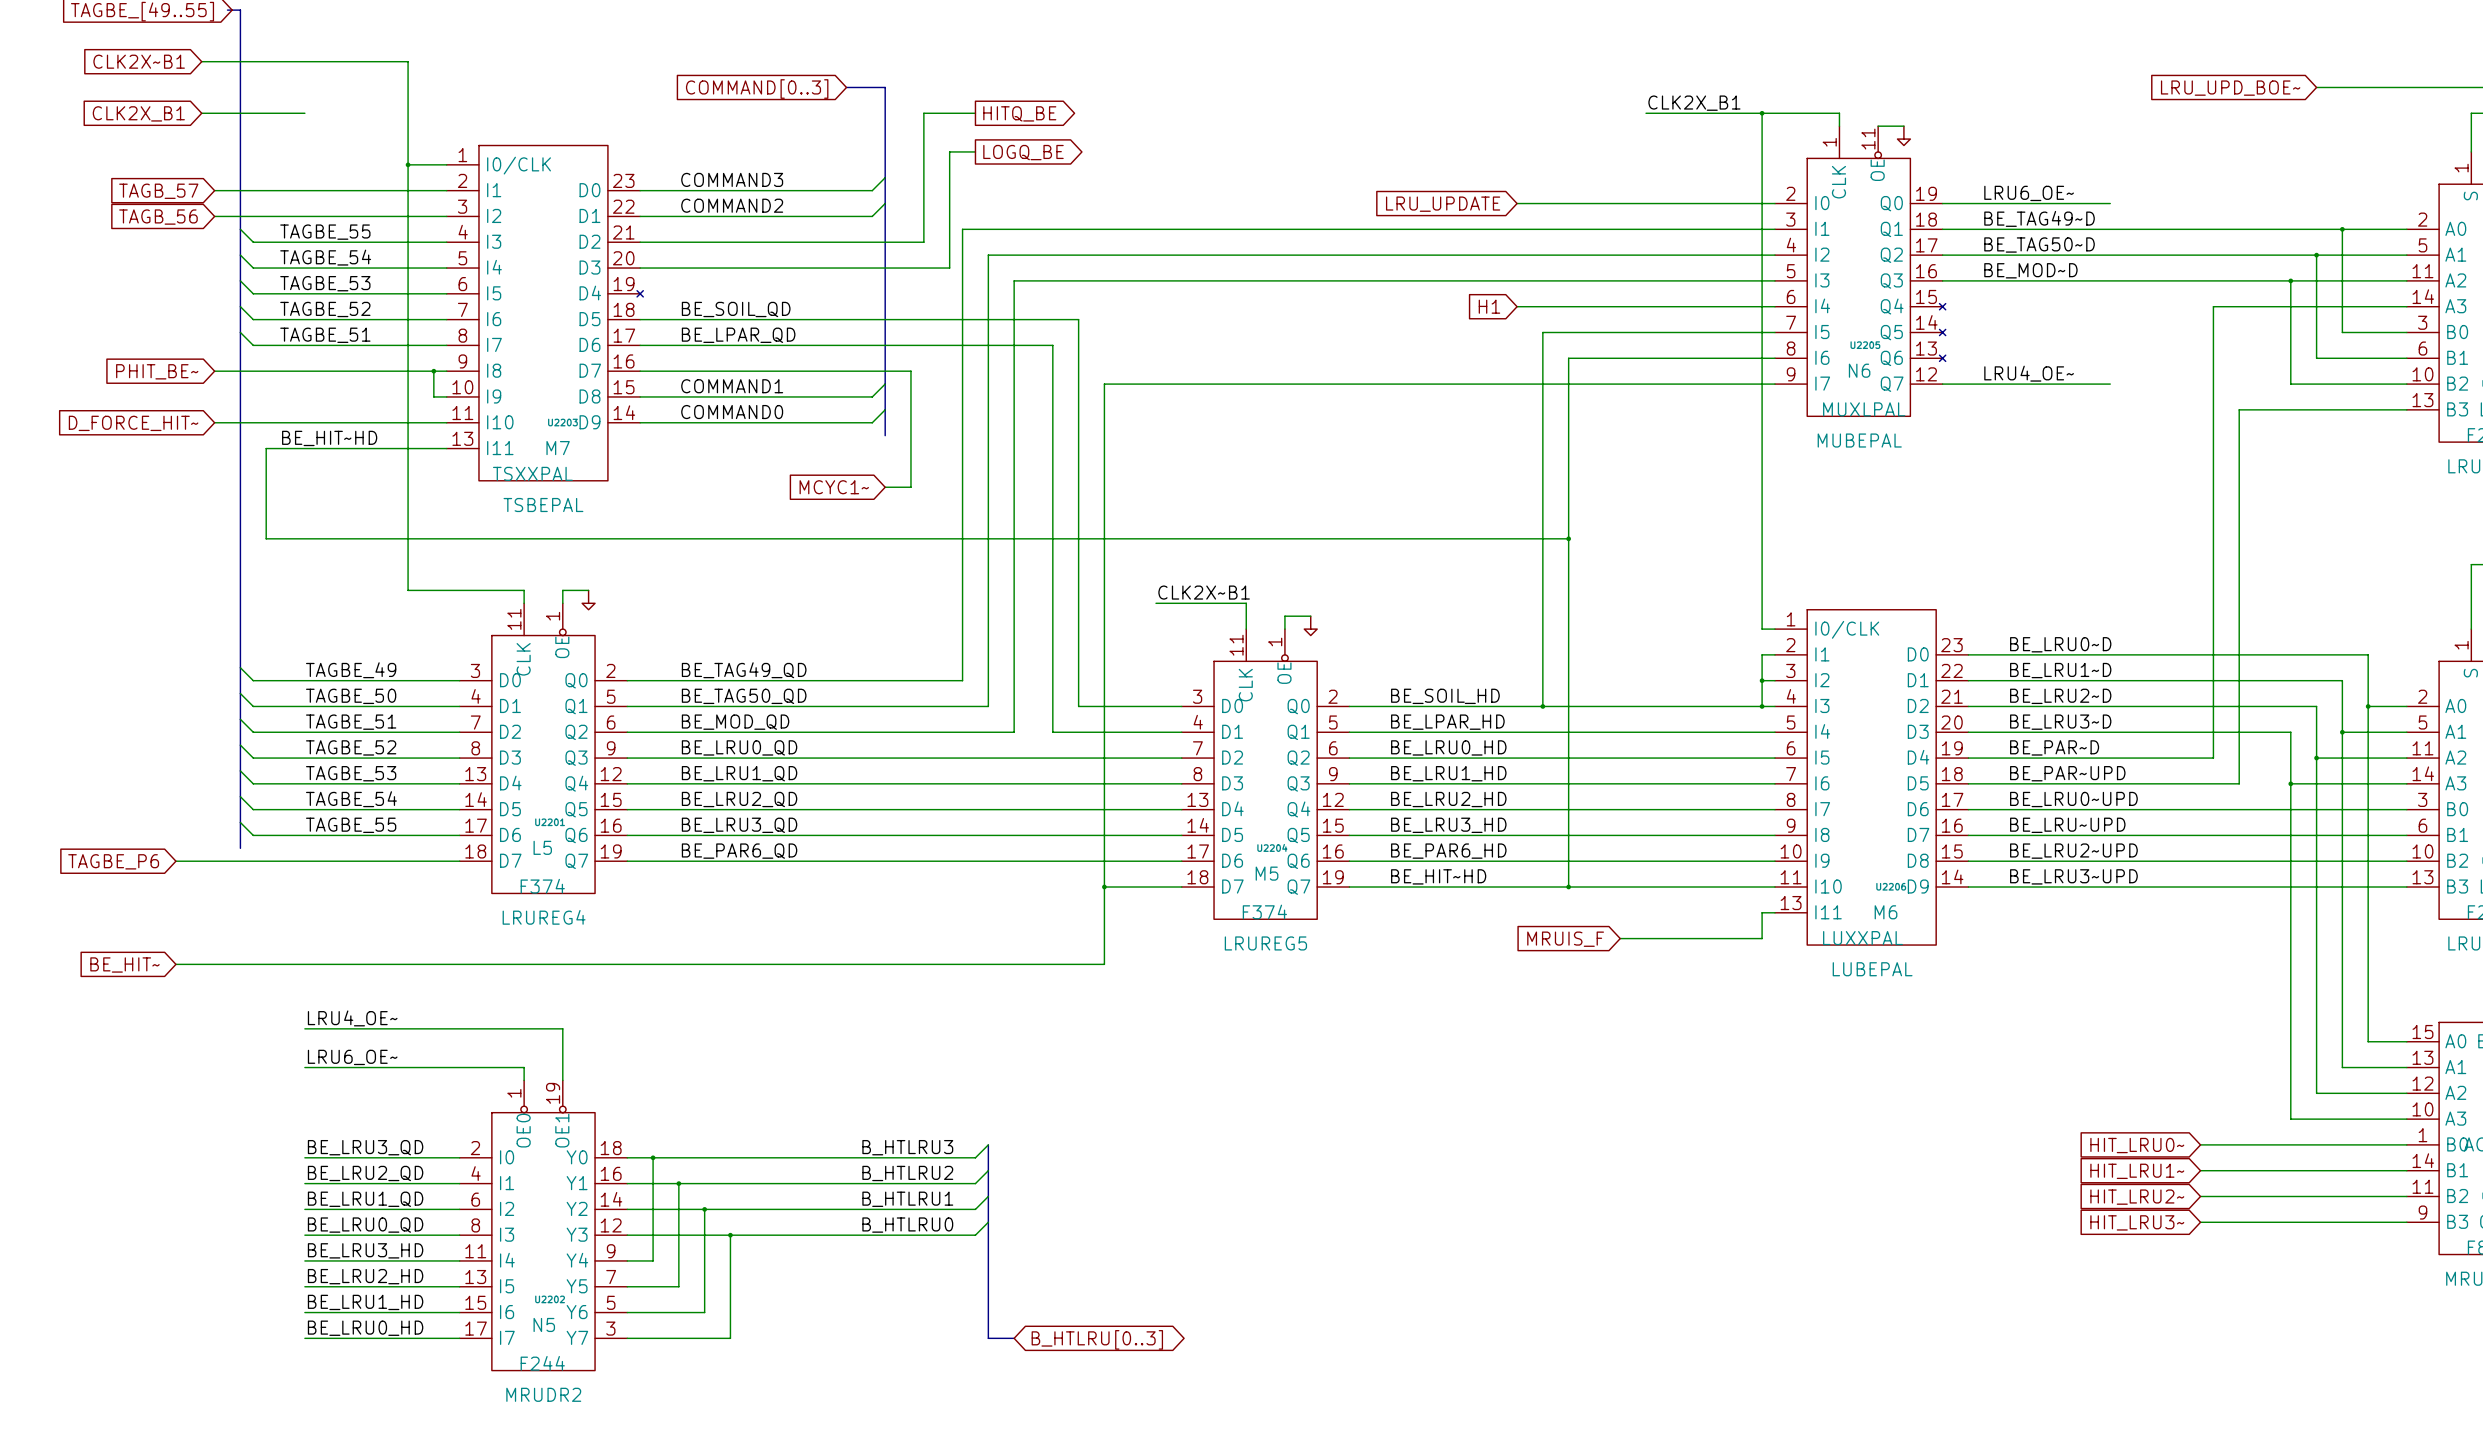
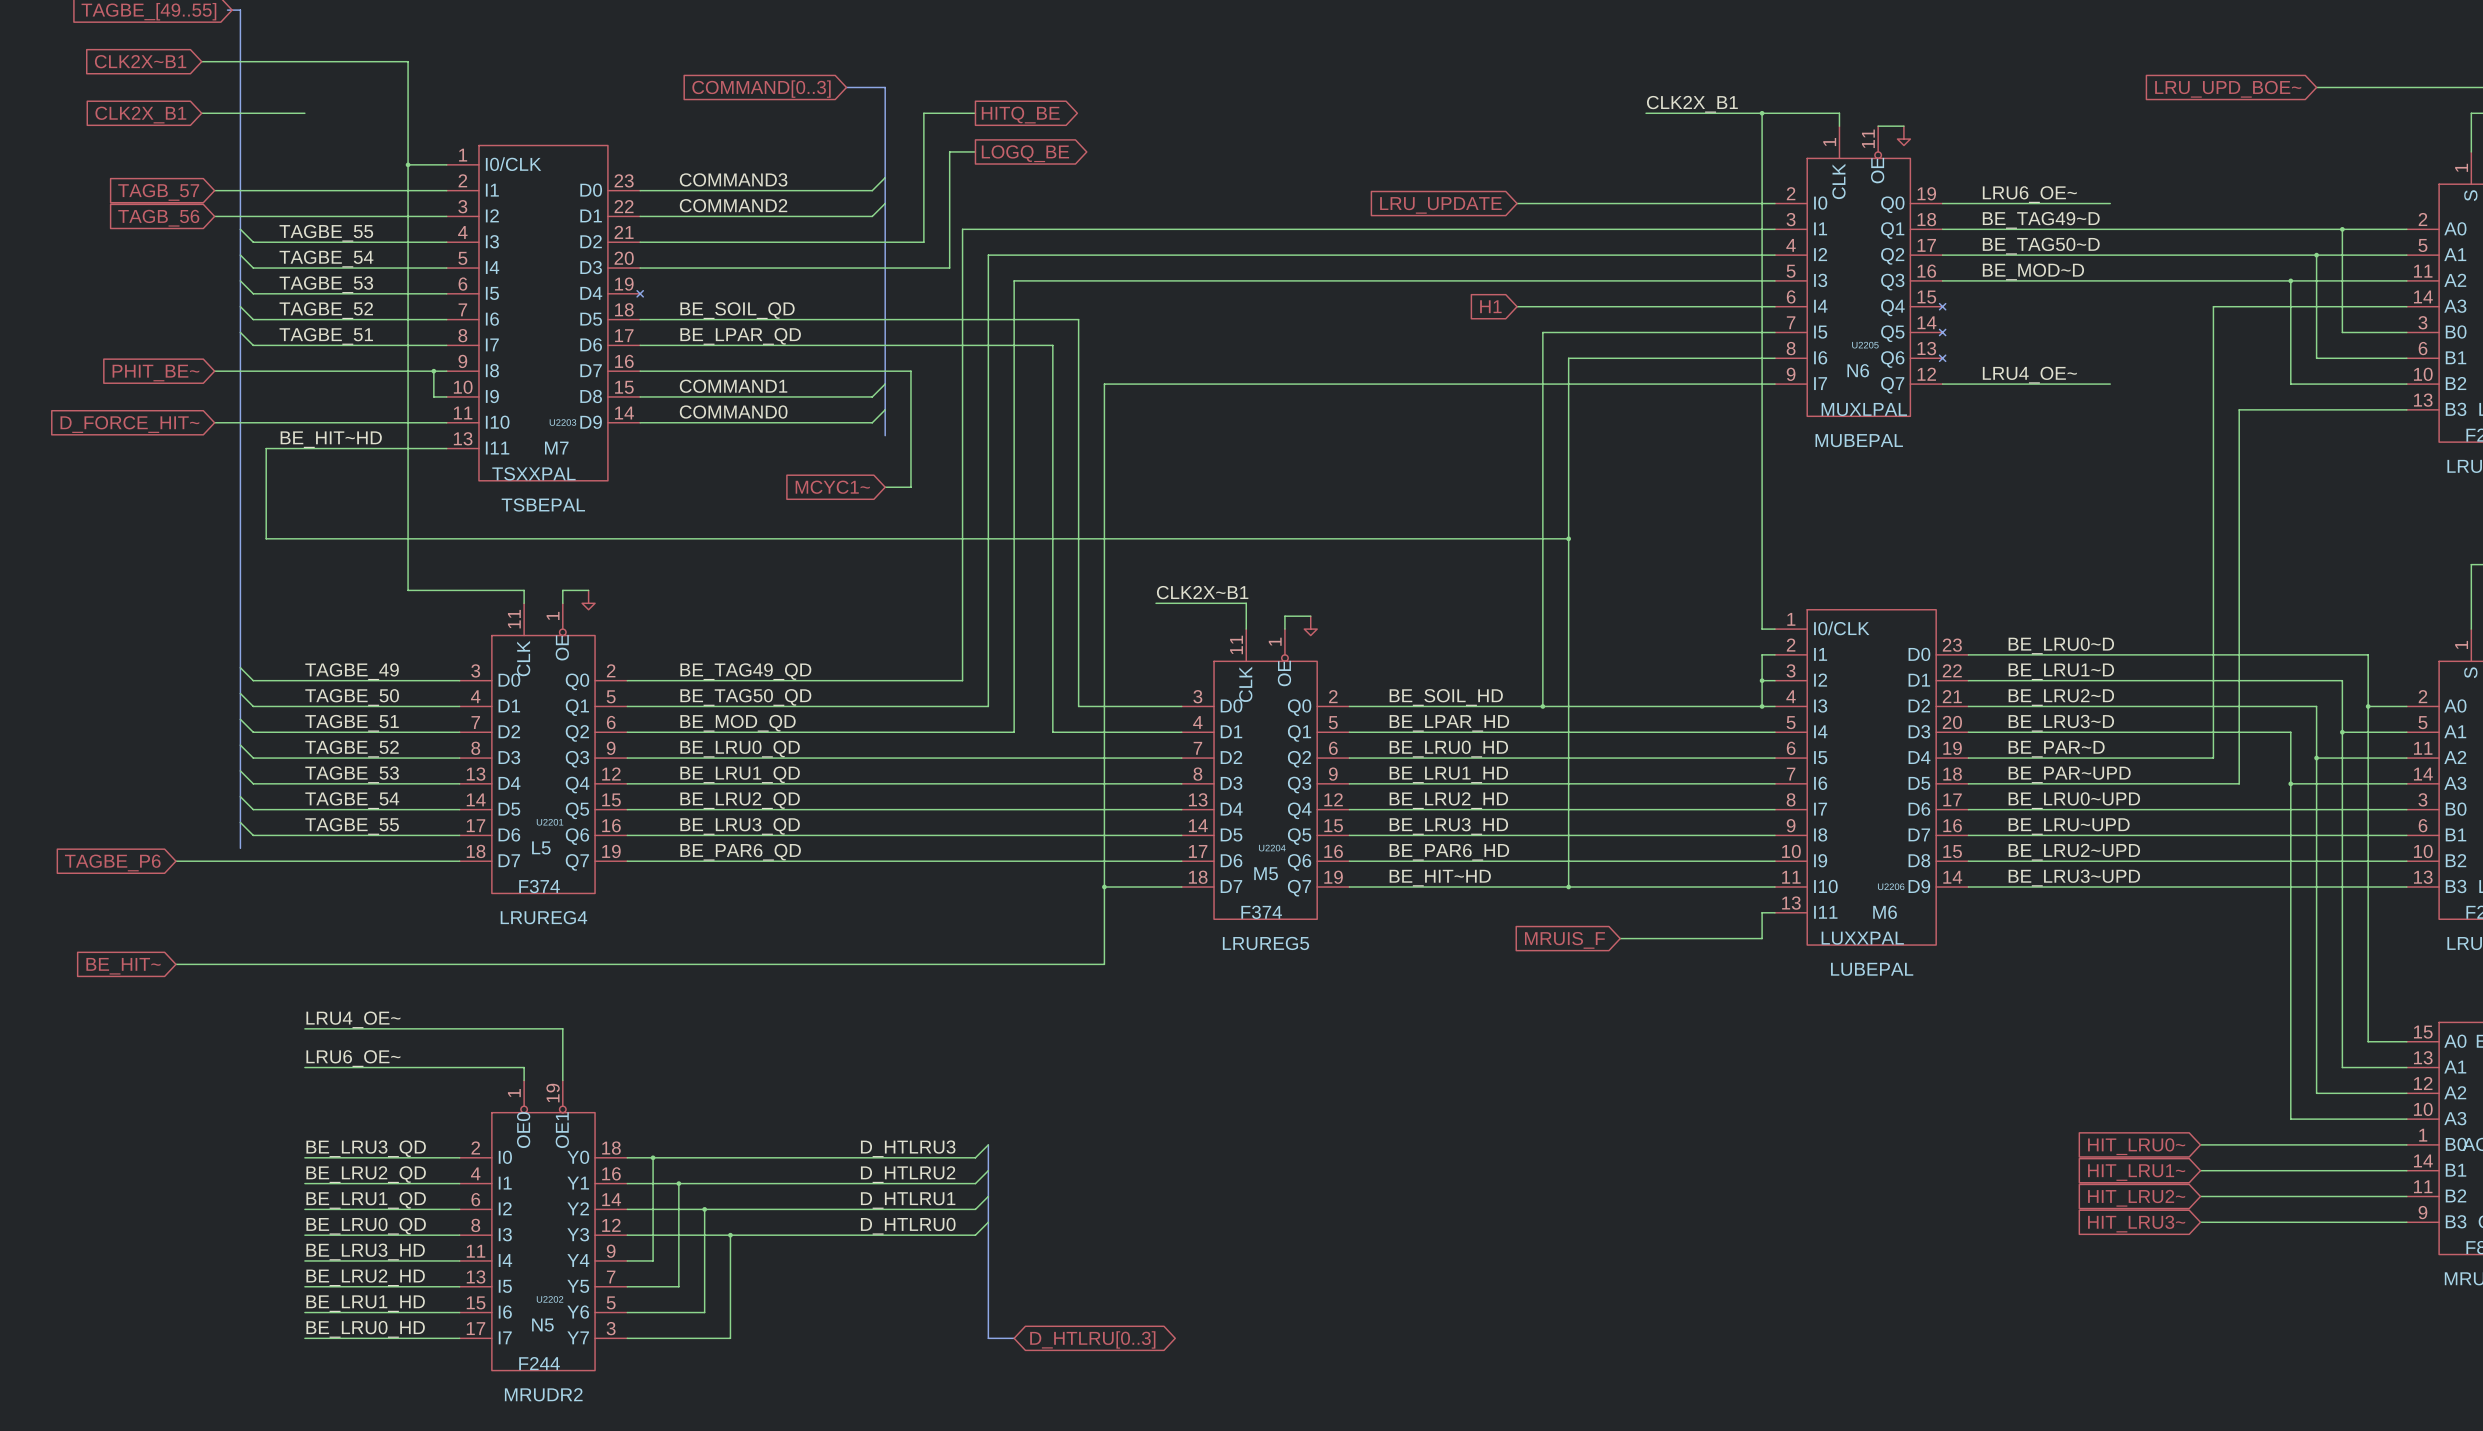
label: B_HTLRU3 (907, 1147) -> D_HTLRU3 (908, 1148)
label: B_HTLRU2 (907, 1173) -> D_HTLRU2 (908, 1174)
label: B_HTLRU1 (907, 1199) -> D_HTLRU1 (908, 1200)
label: B_HTLRU0 (907, 1225) -> D_HTLRU0 (908, 1226)
global label: B_HTLRU[0..3] (1097, 1339) -> D_HTLRU[0..3] (1092, 1339)

